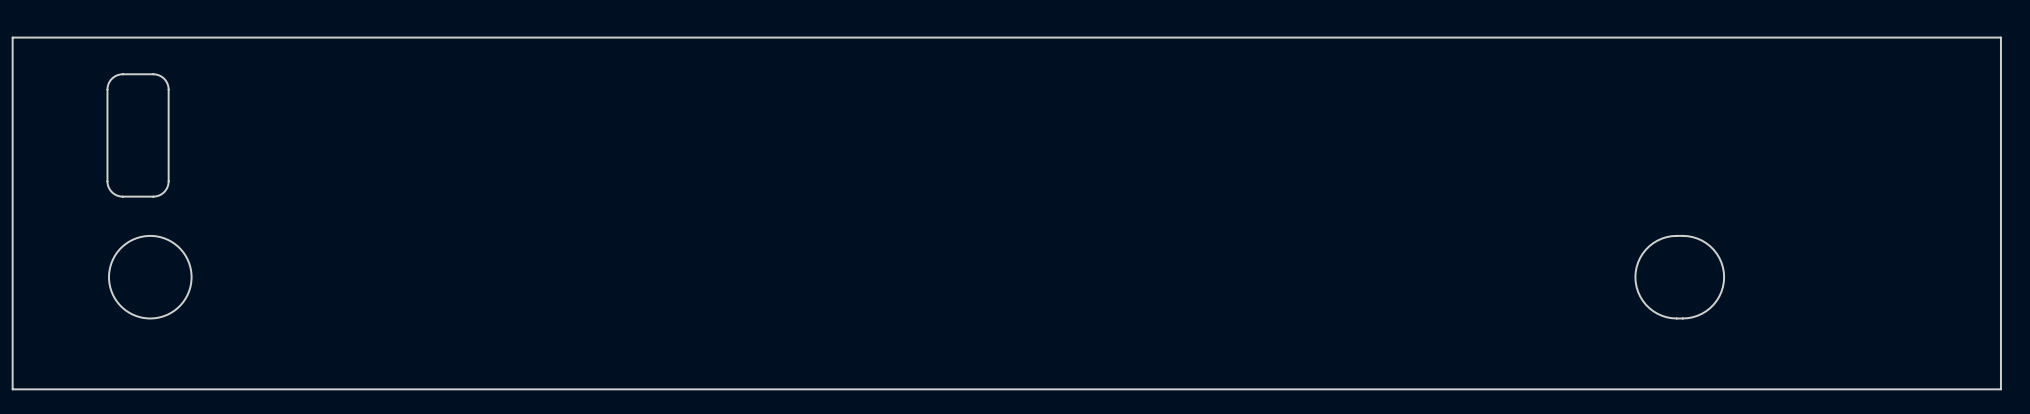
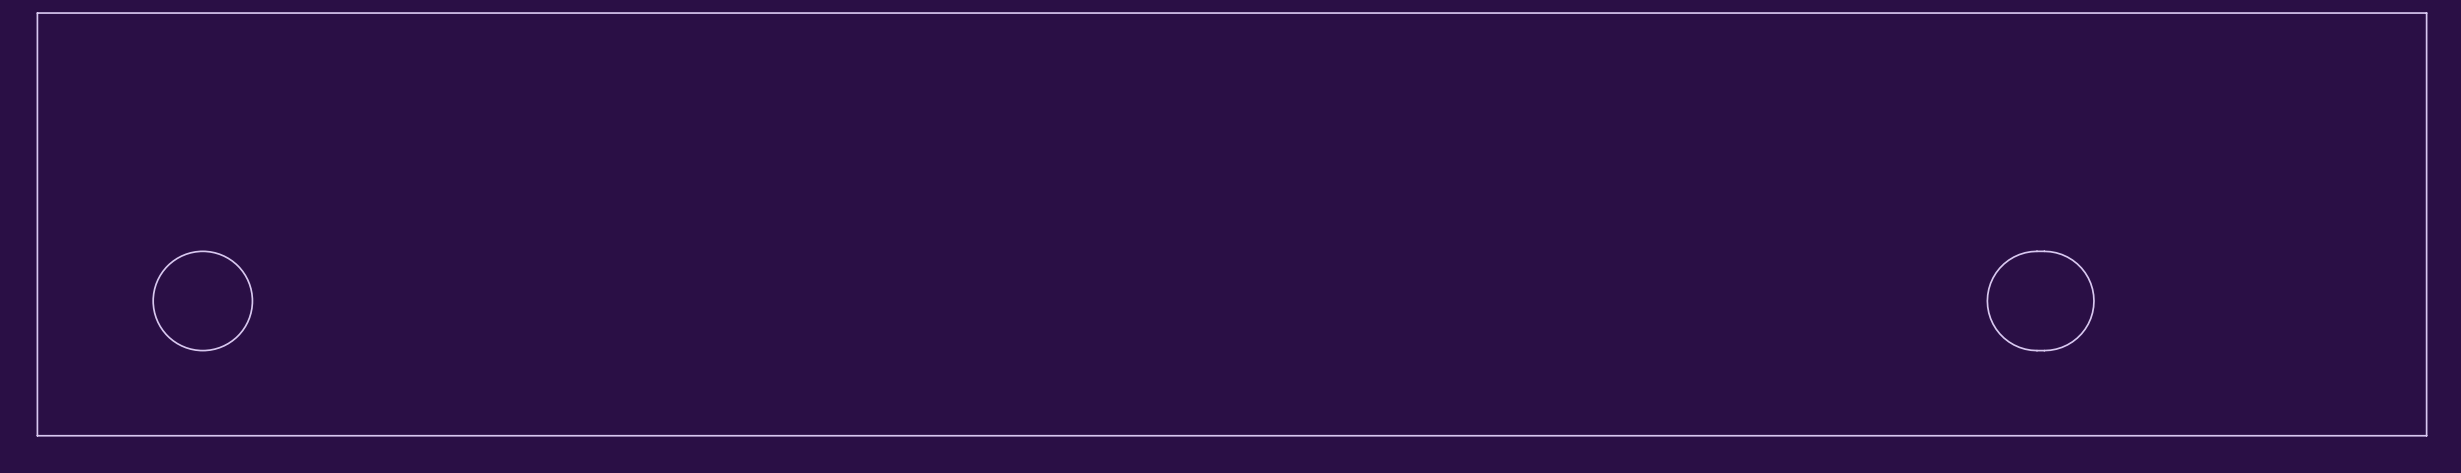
board edge: (153, 74) (118, 74) (111, 78) (107, 85) (107, 183) (110, 190) (118, 196) (157, 196) (164, 192) (168, 185) (168, 87) (164, 78) (153, 74) -> none

